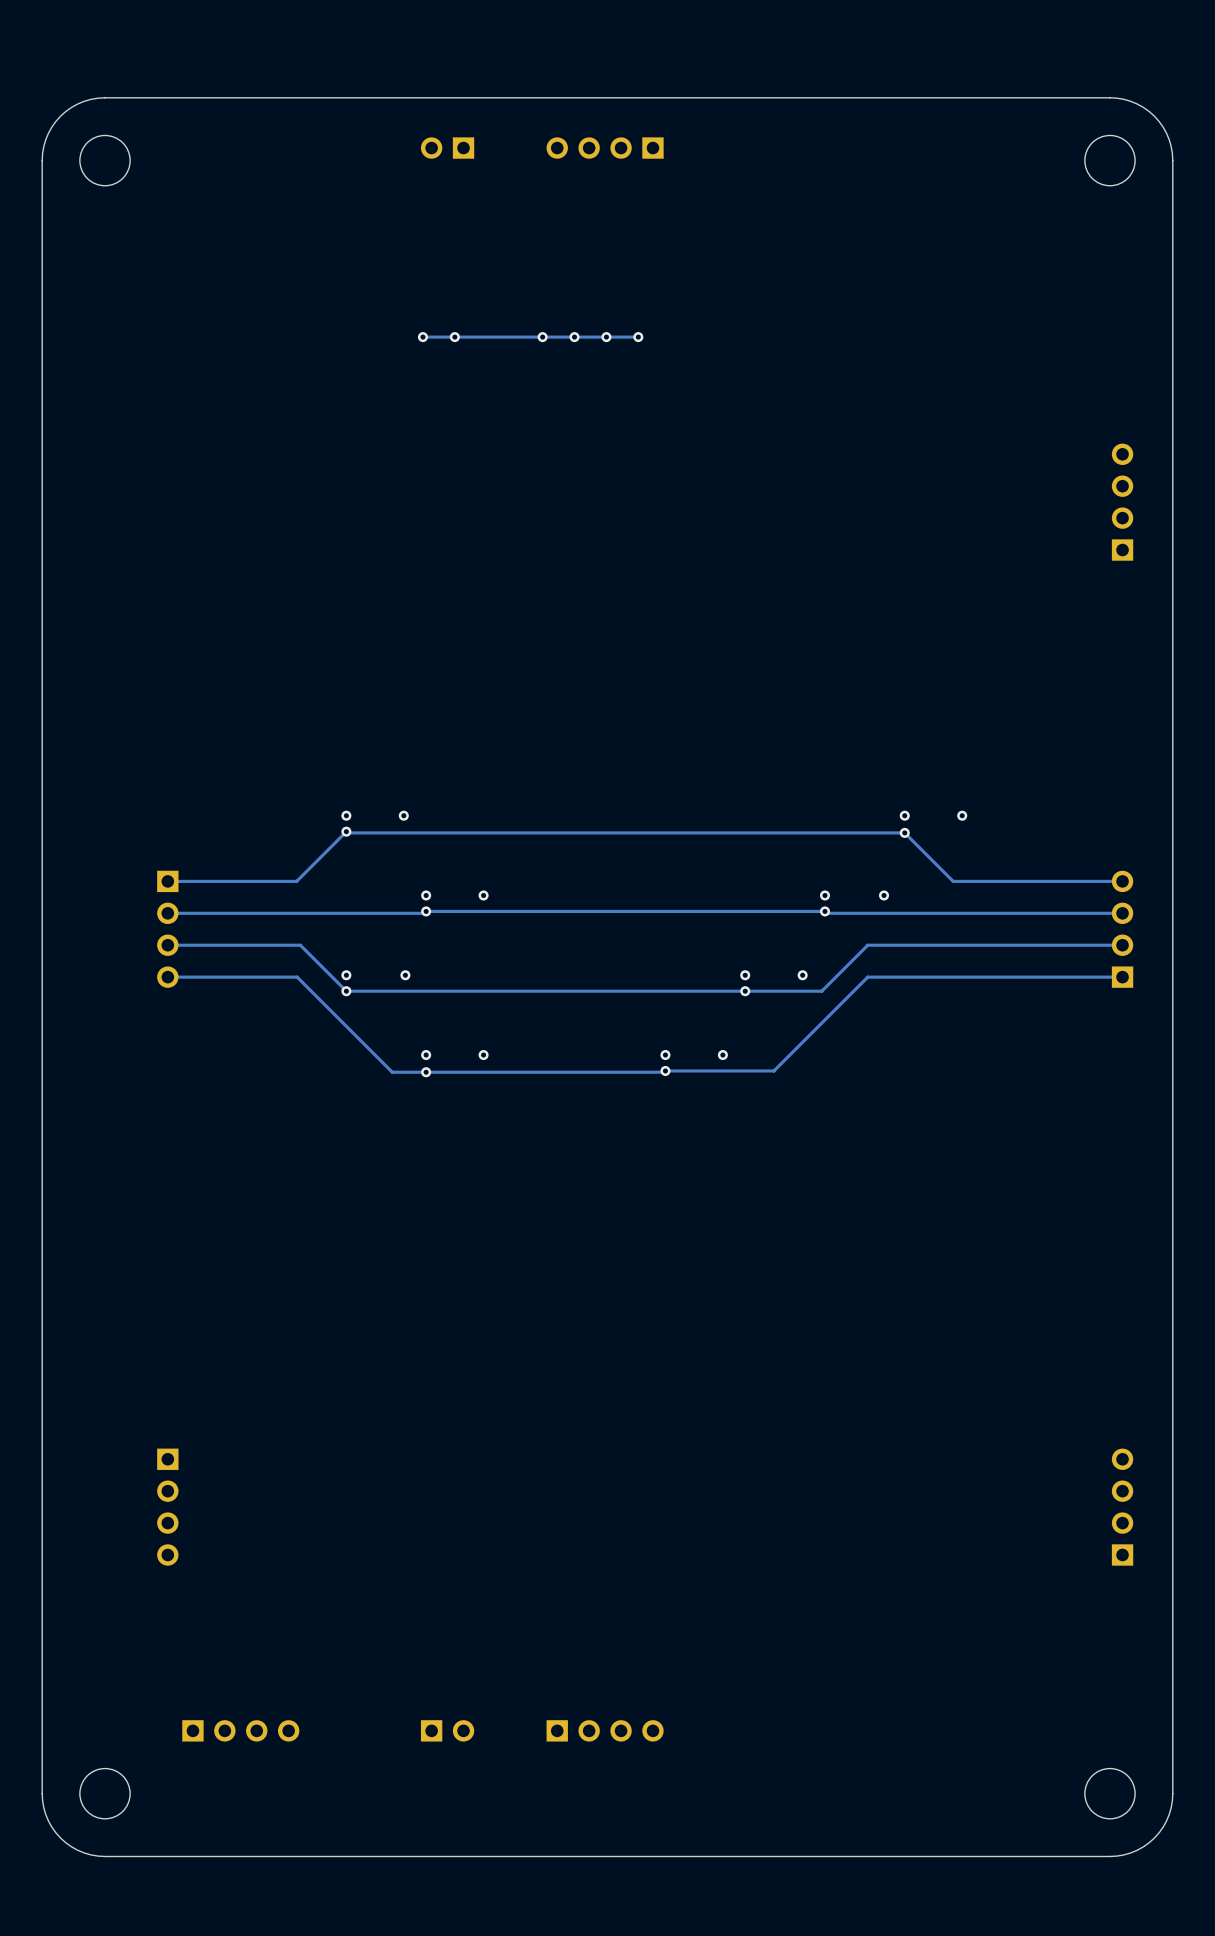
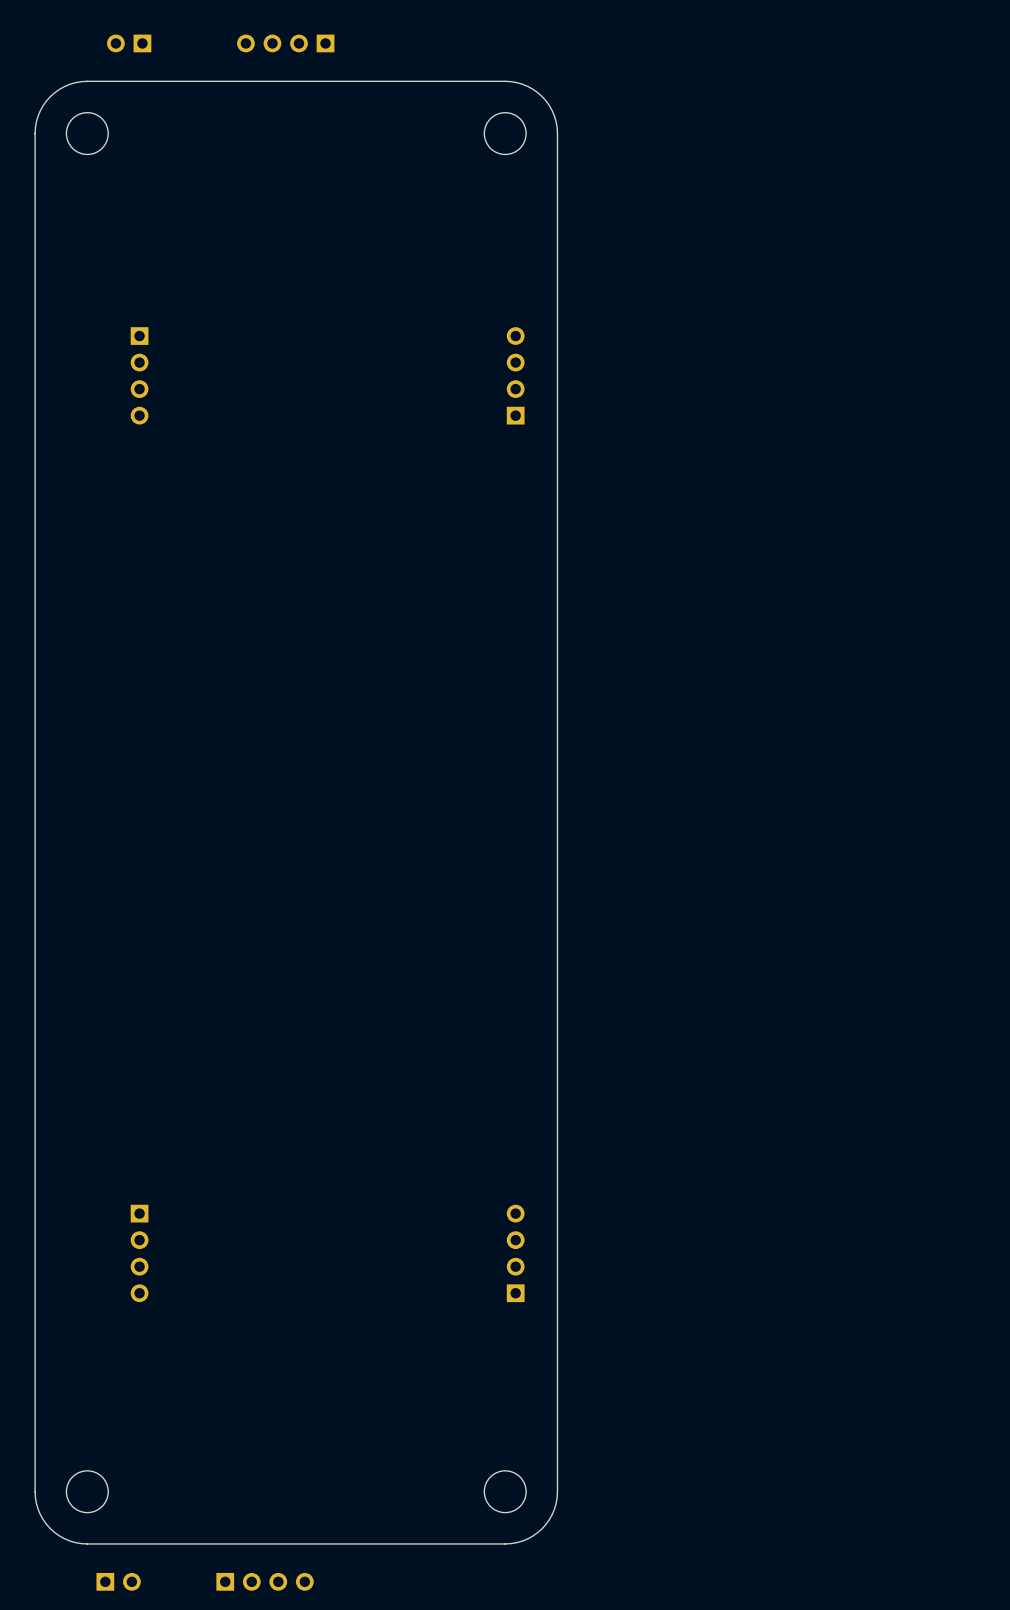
part: none -> (285, 43)
board edge: (607, 97) (1117, 98) (1137, 104) (1154, 116) (1163, 127) (1169, 139) (1172, 160) (1172, 1793) (1169, 1814) (1163, 1827) (1149, 1842) (1137, 1850) (1117, 1856) (607, 1856) -> (505, 81) (527, 86) (542, 96) (552, 110) (557, 133) (557, 1491) (554, 1508) (542, 1528) (522, 1541) (505, 1543)
round board edge: none -> [483, 112, 527, 155]
round board edge: [1084, 134, 1136, 187] -> none
part position: (447, 148) -> (129, 43)
part: (605, 148) -> none
via: (422, 337) -> none
via: (454, 337) -> none
via: (542, 337) -> none
via: (574, 337) -> none
via: (606, 337) -> none
track: (638, 337) (422, 337) -> none
via: (638, 337) -> none
part: none -> (139, 375)
part: none -> (515, 375)
part: (1122, 502) -> none
via: (346, 815) -> none
via: (403, 815) -> none
via: (904, 815) -> none
via: (962, 815) -> none
via: (346, 831) -> none
via: (904, 832) -> none
track: (1122, 881) (953, 881) (904, 832) (346, 831) (296, 881) (167, 881) -> none
via: (426, 895) -> none
via: (483, 895) -> none
via: (824, 895) -> none
via: (884, 895) -> none
via: (426, 911) -> none
via: (824, 911) -> none
track: (1122, 913) (826, 913) (824, 911) (167, 913) -> none
part: (167, 929) -> none
part: (1122, 929) -> none
track: (1122, 945) (867, 945) (821, 991) (346, 991) (300, 945) (167, 945) -> none
via: (346, 975) -> none
via: (405, 975) -> none
via: (745, 975) -> none
via: (802, 975) -> none
track: (1122, 977) (867, 977) (773, 1070) (664, 1072) (392, 1072) (297, 977) (167, 977) -> none
via: (346, 991) -> none
via: (745, 991) -> none
via: (426, 1055) -> none
via: (483, 1055) -> none
via: (665, 1055) -> none
via: (722, 1055) -> none
via: (665, 1070) -> none
via: (426, 1072) -> none
part: none -> (515, 1253)
part: (1122, 1507) -> none
part: (240, 1730) -> none
part: (447, 1730) -> none
part: (605, 1730) -> none
round board edge: none -> [483, 1470, 527, 1514]
round board edge: [1084, 1767, 1136, 1820] -> none
part: none -> (118, 1581)
part: none -> (265, 1581)

